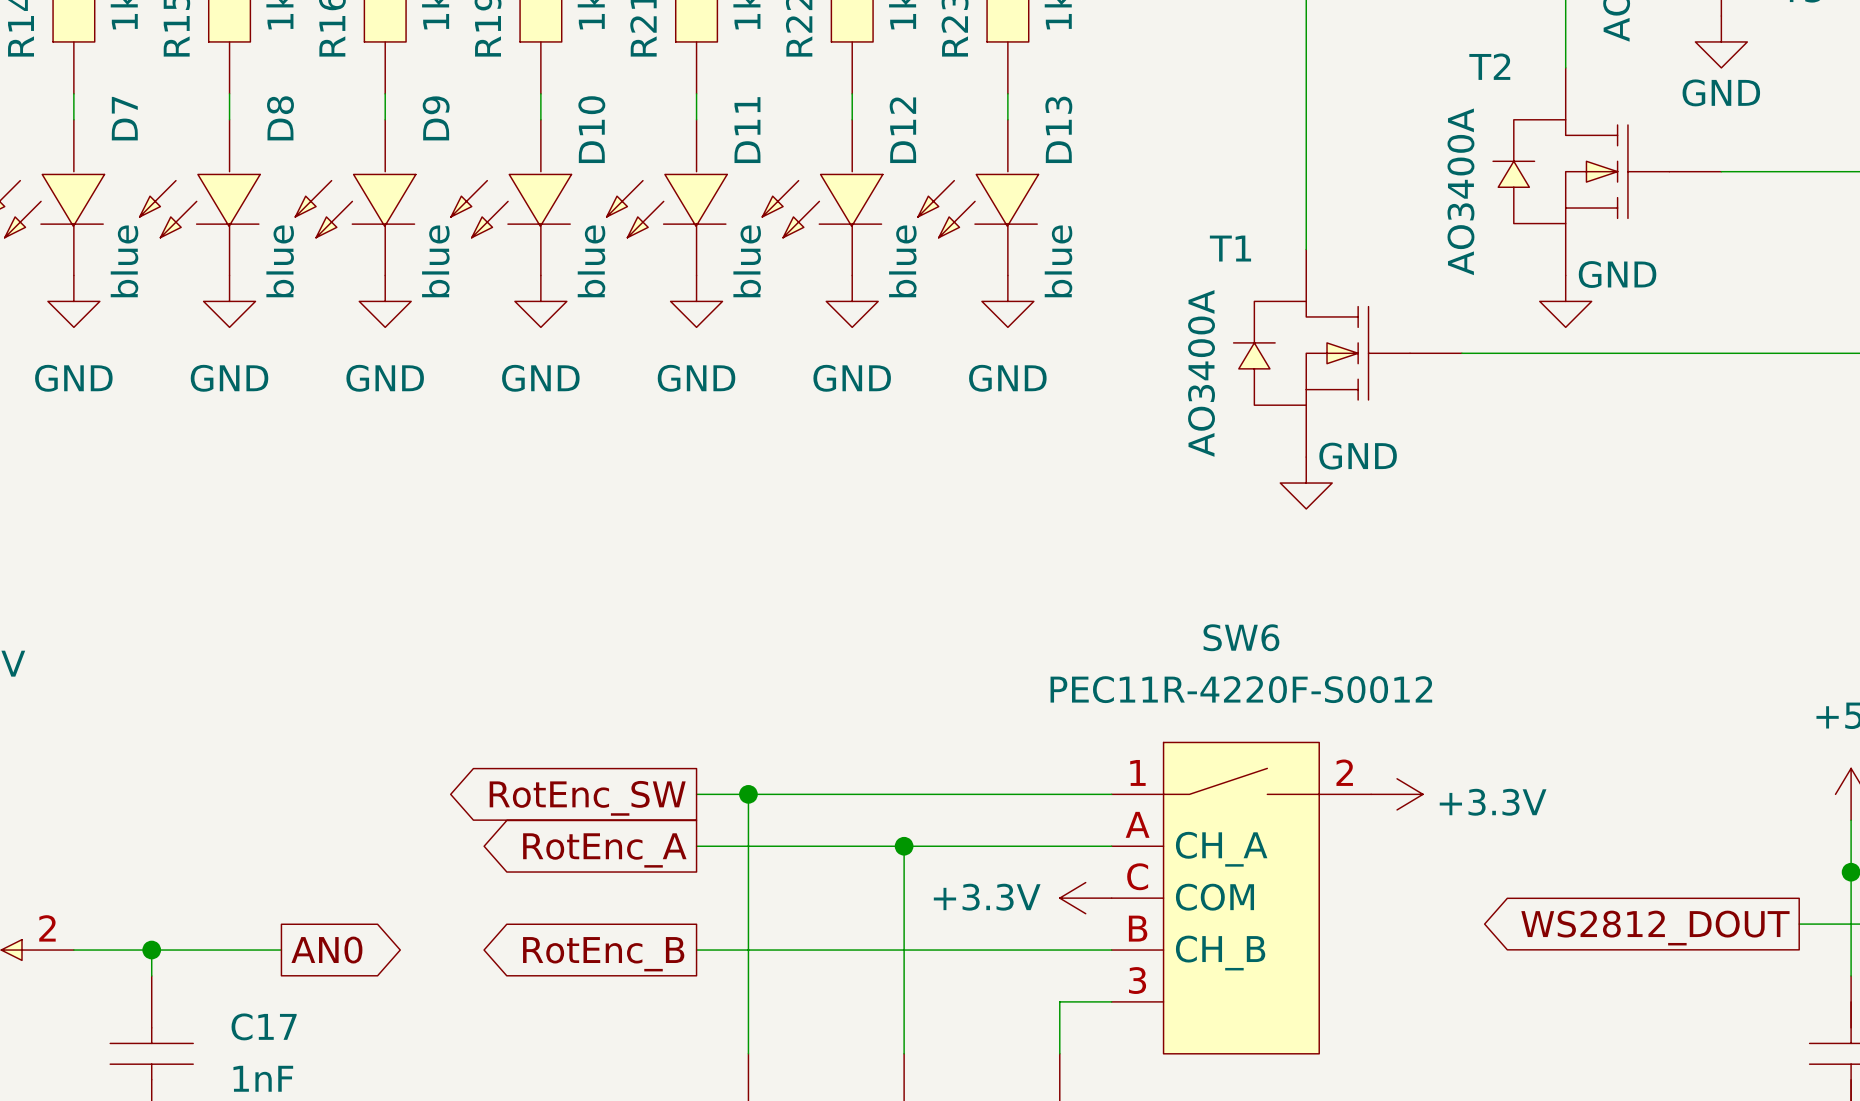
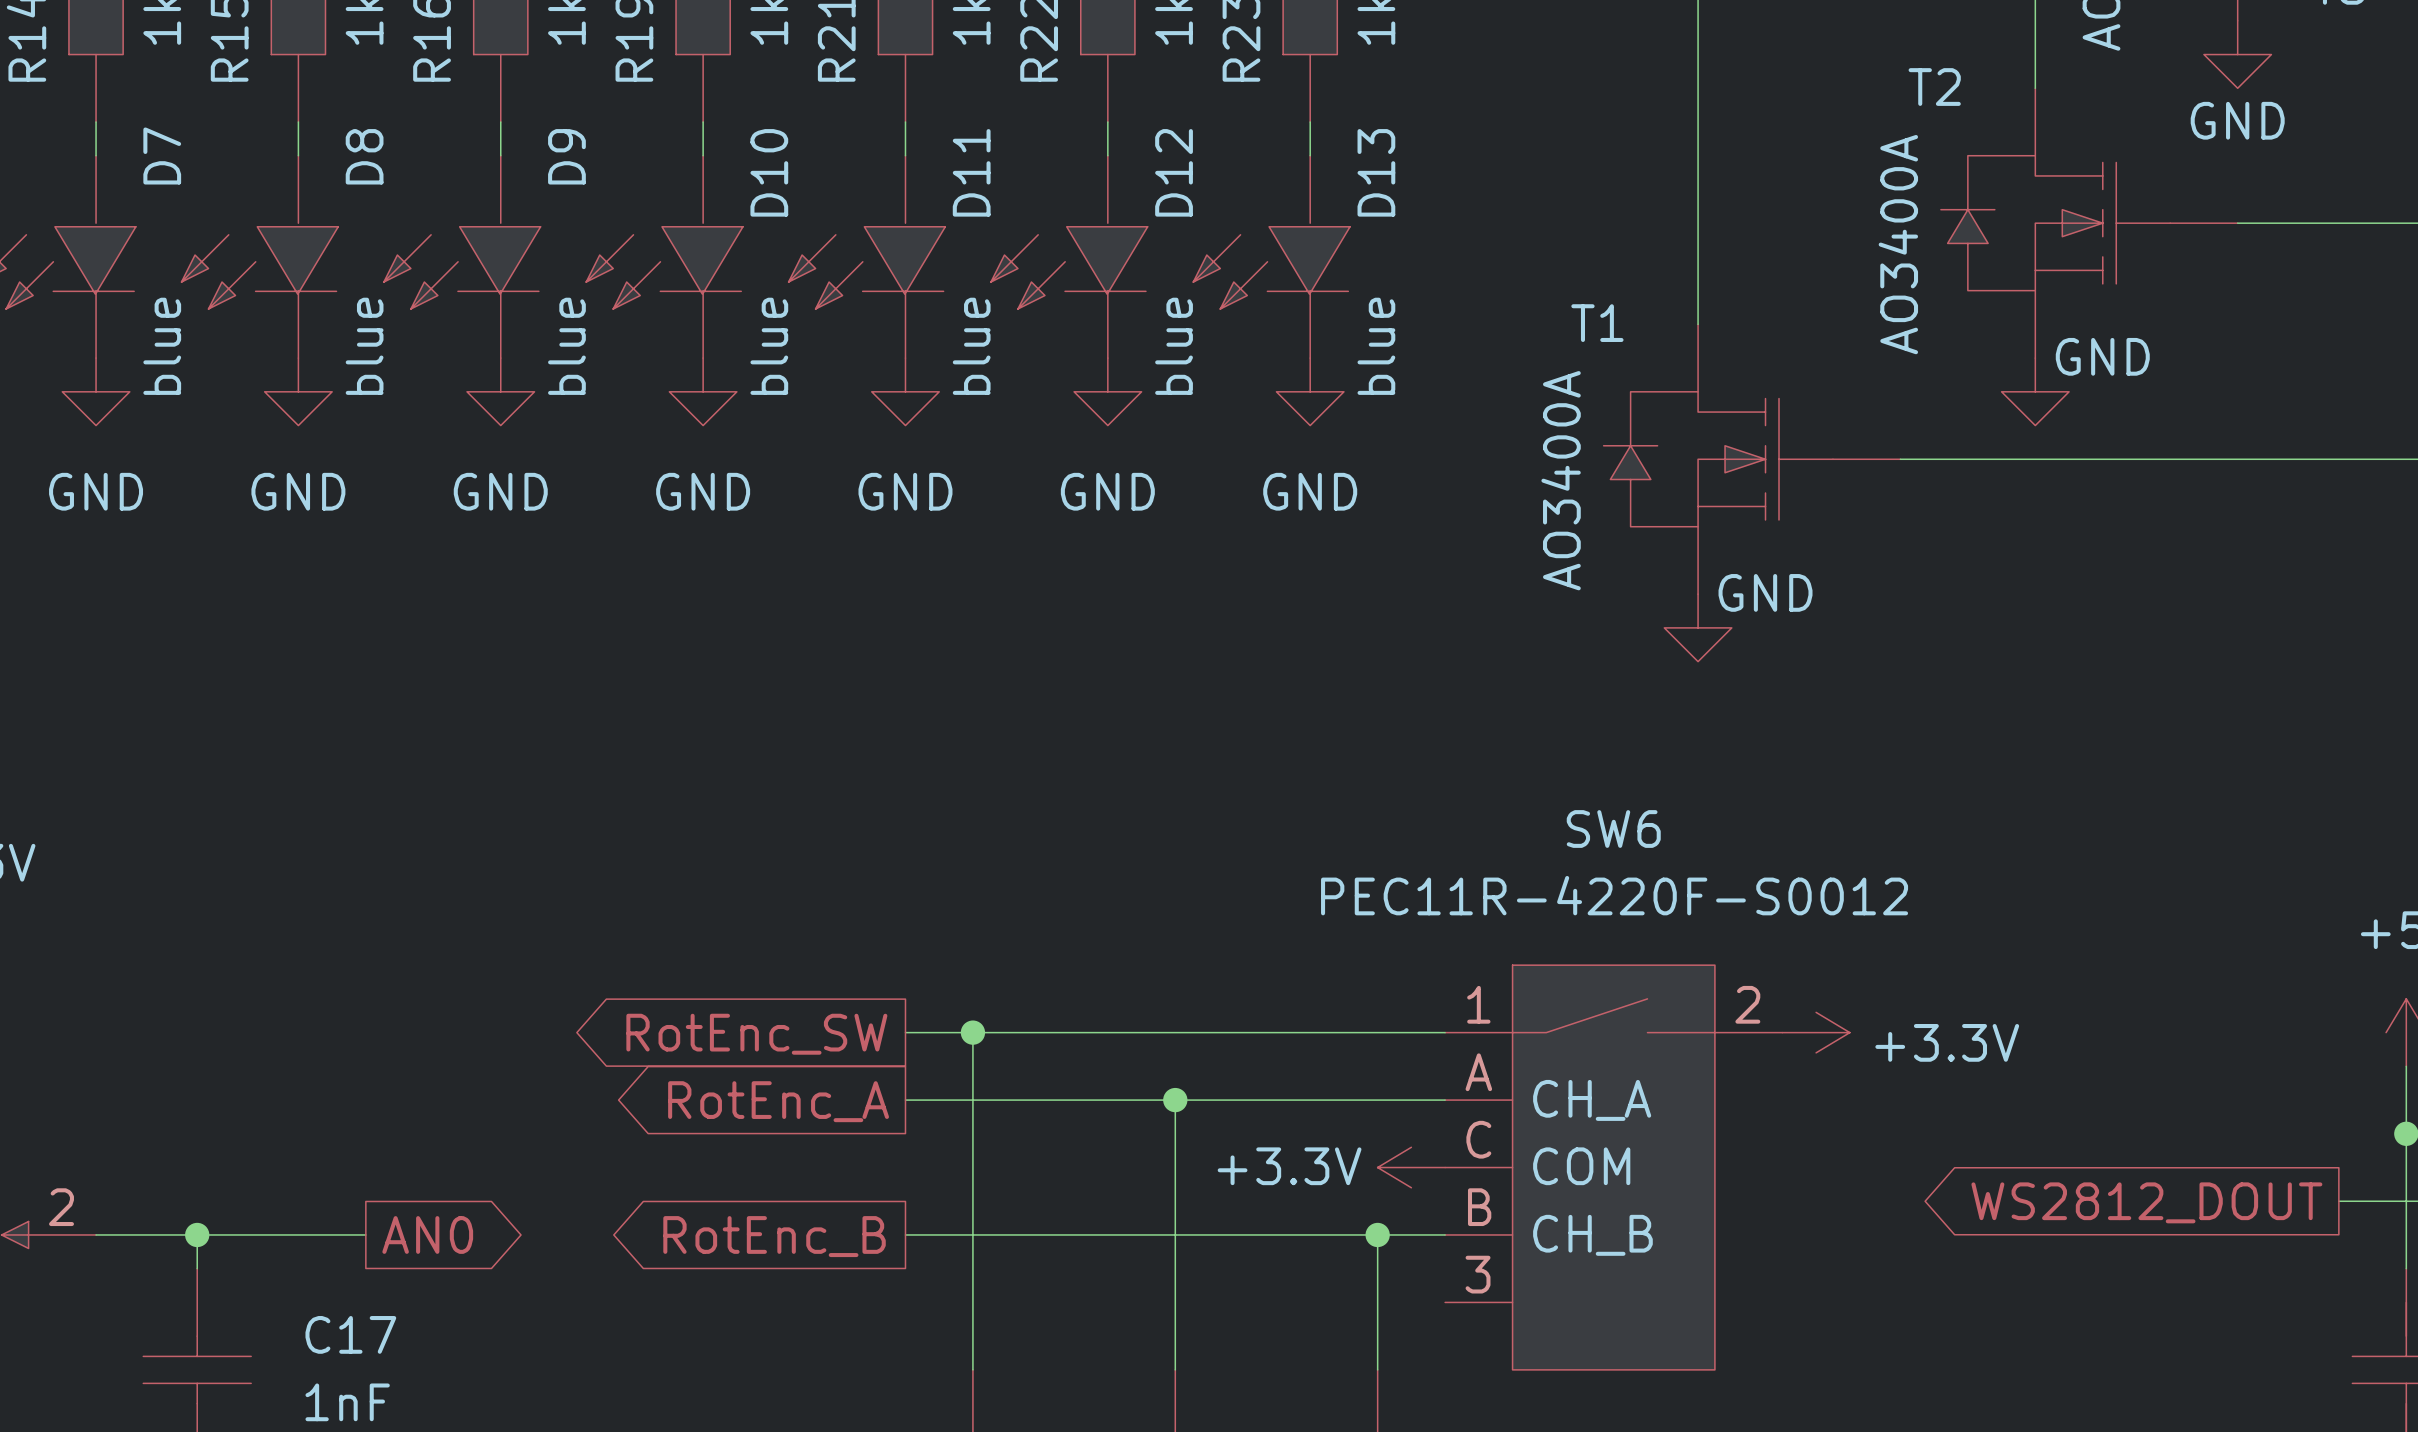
junction: none -> (1377, 1234)
wire: (1059, 1001) (1111, 1001) -> (1377, 1302) (1377, 1234)

